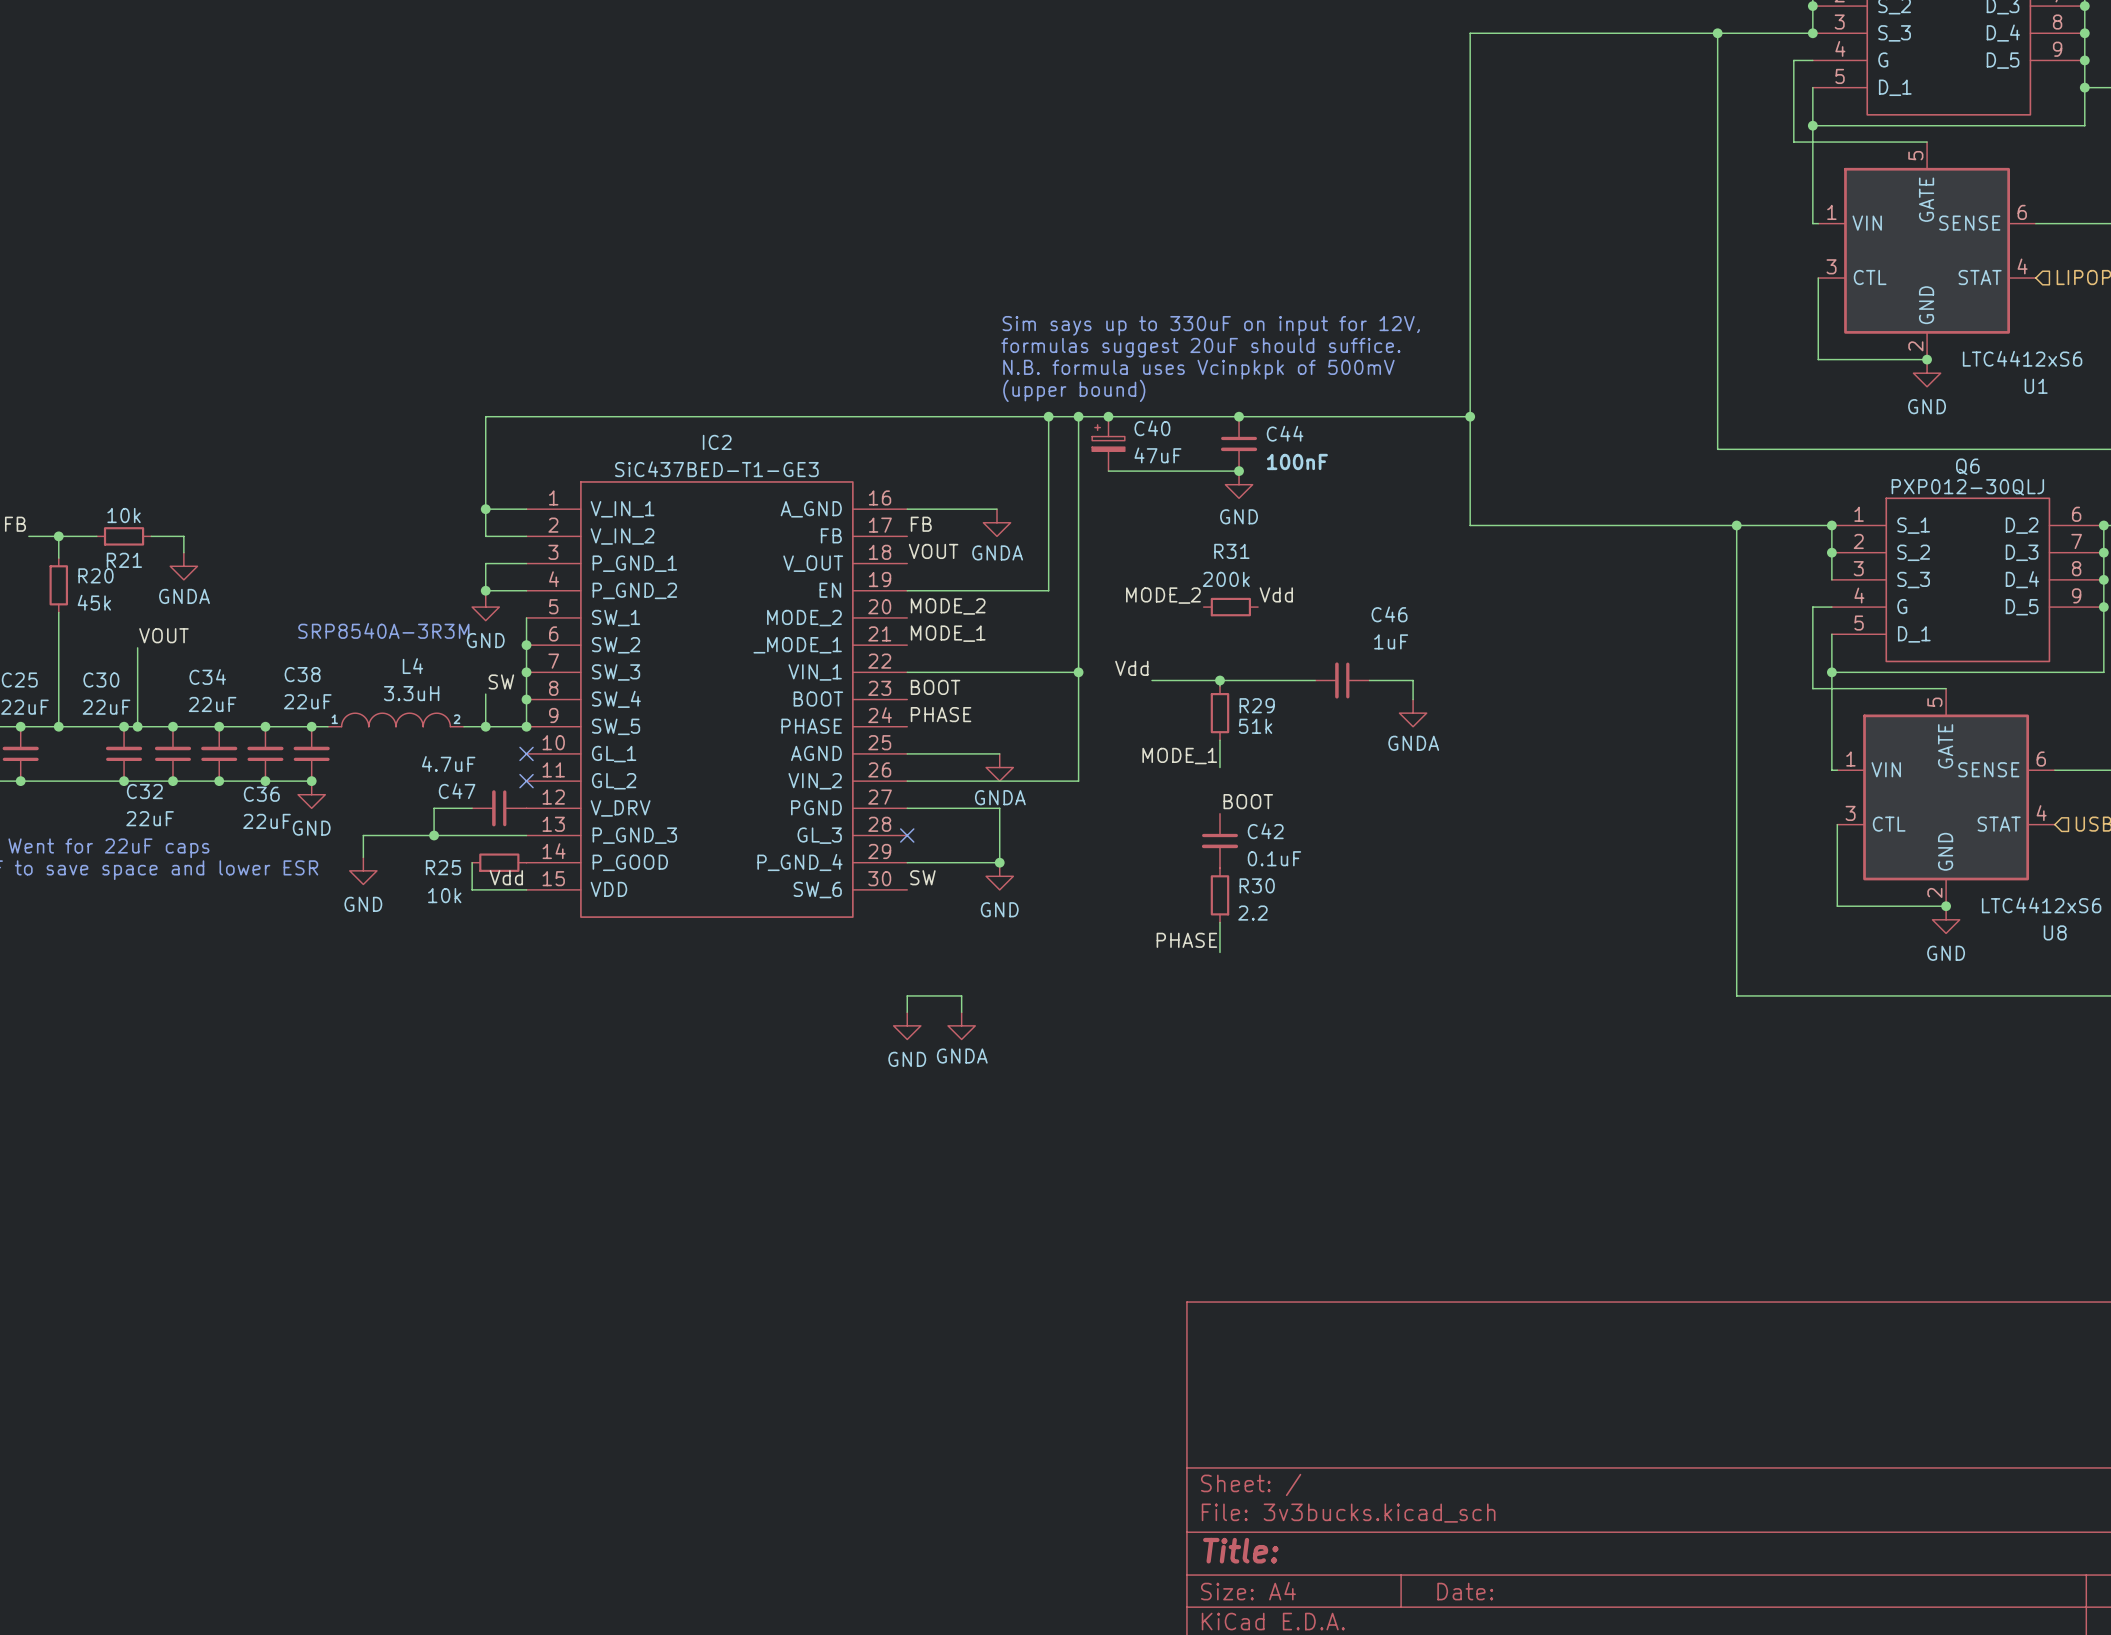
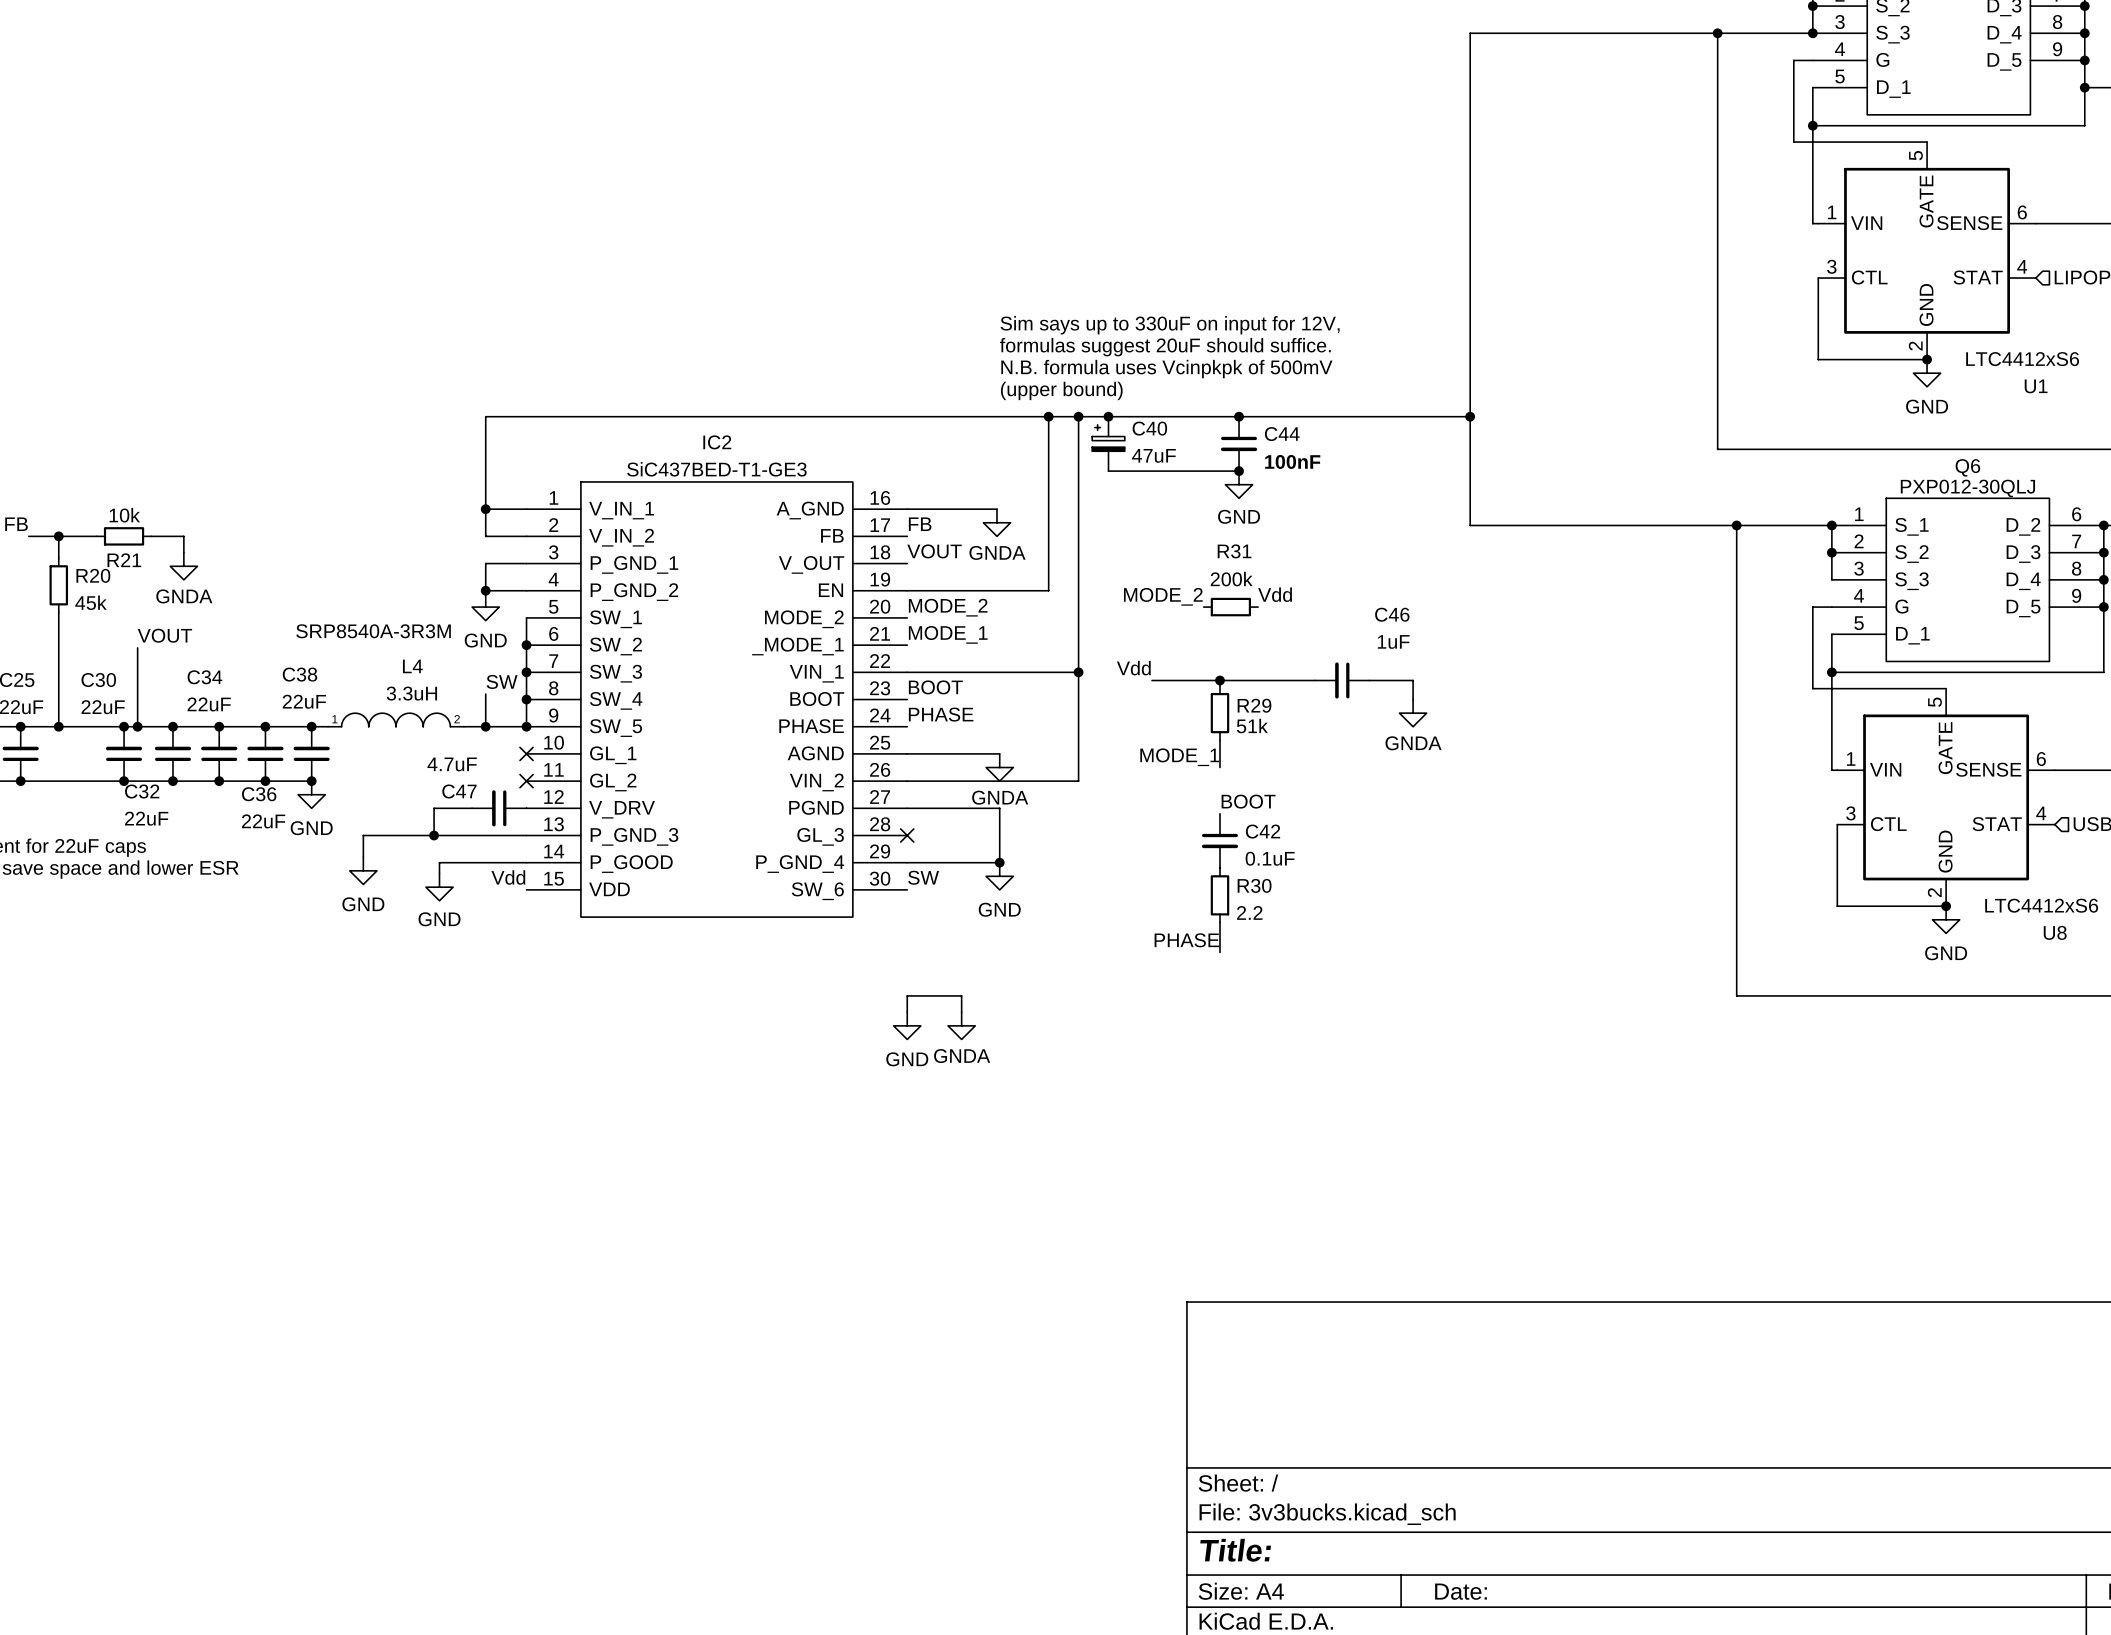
wire: (472, 862) (472, 889) (526, 889) -> none
R25: 10k (499, 862) -> none
wire: none -> (526, 862) (439, 862) (439, 873)
power symbol: none -> GND (439, 887)

